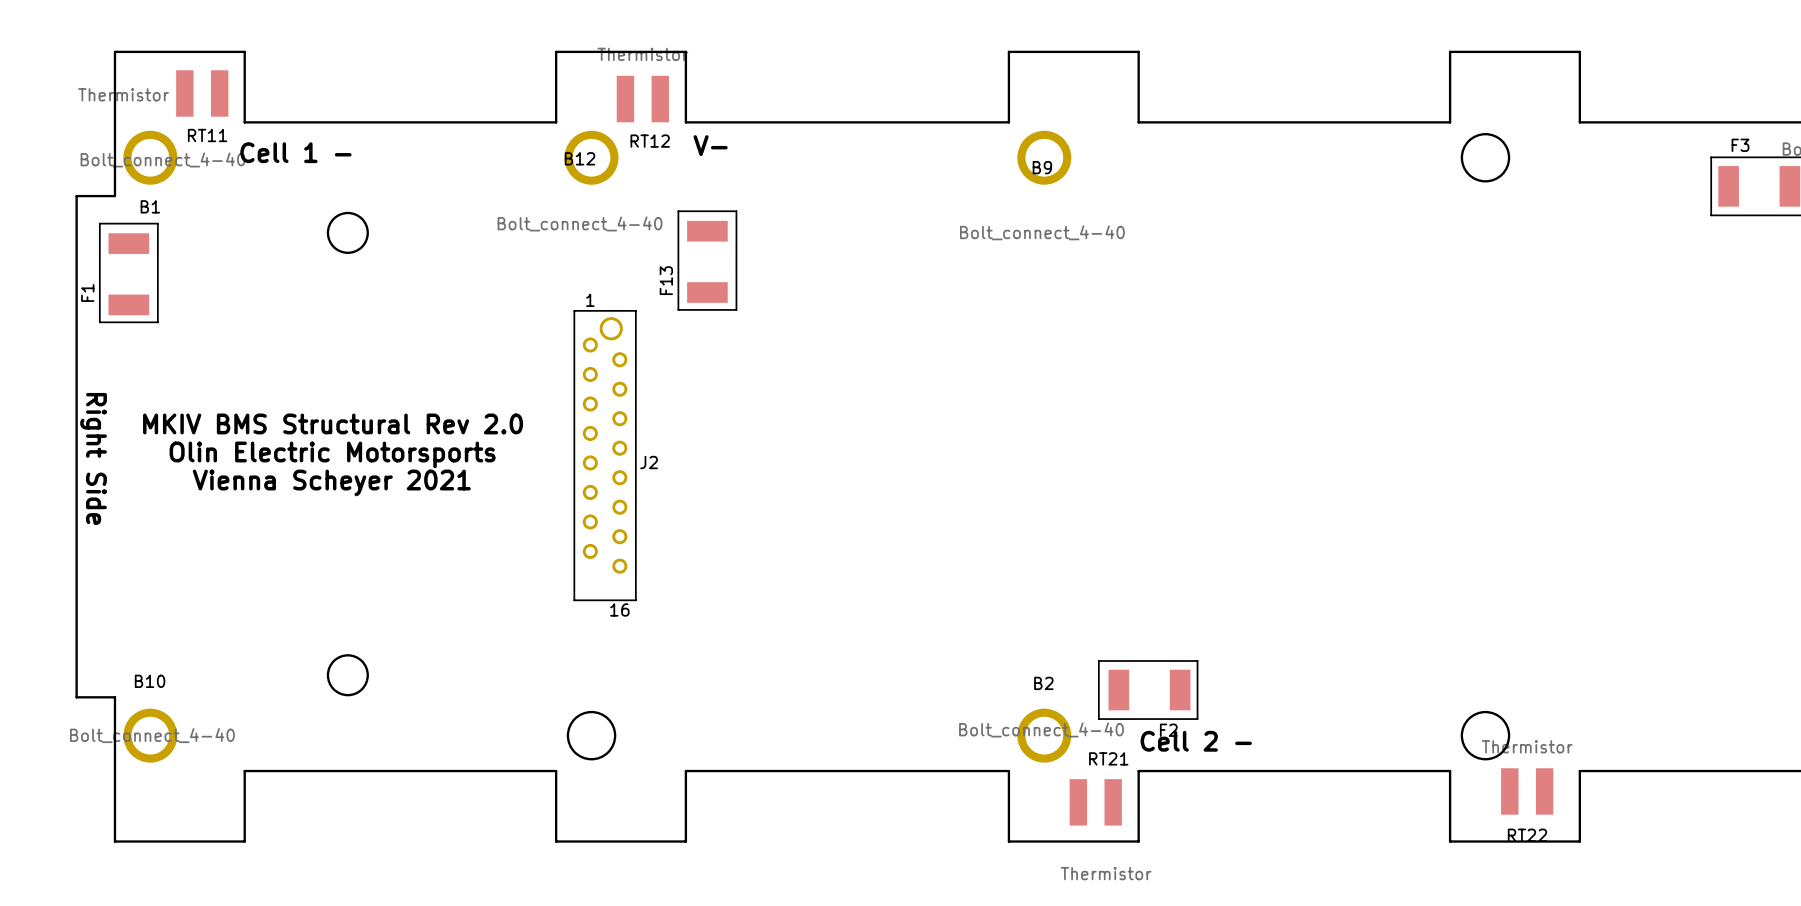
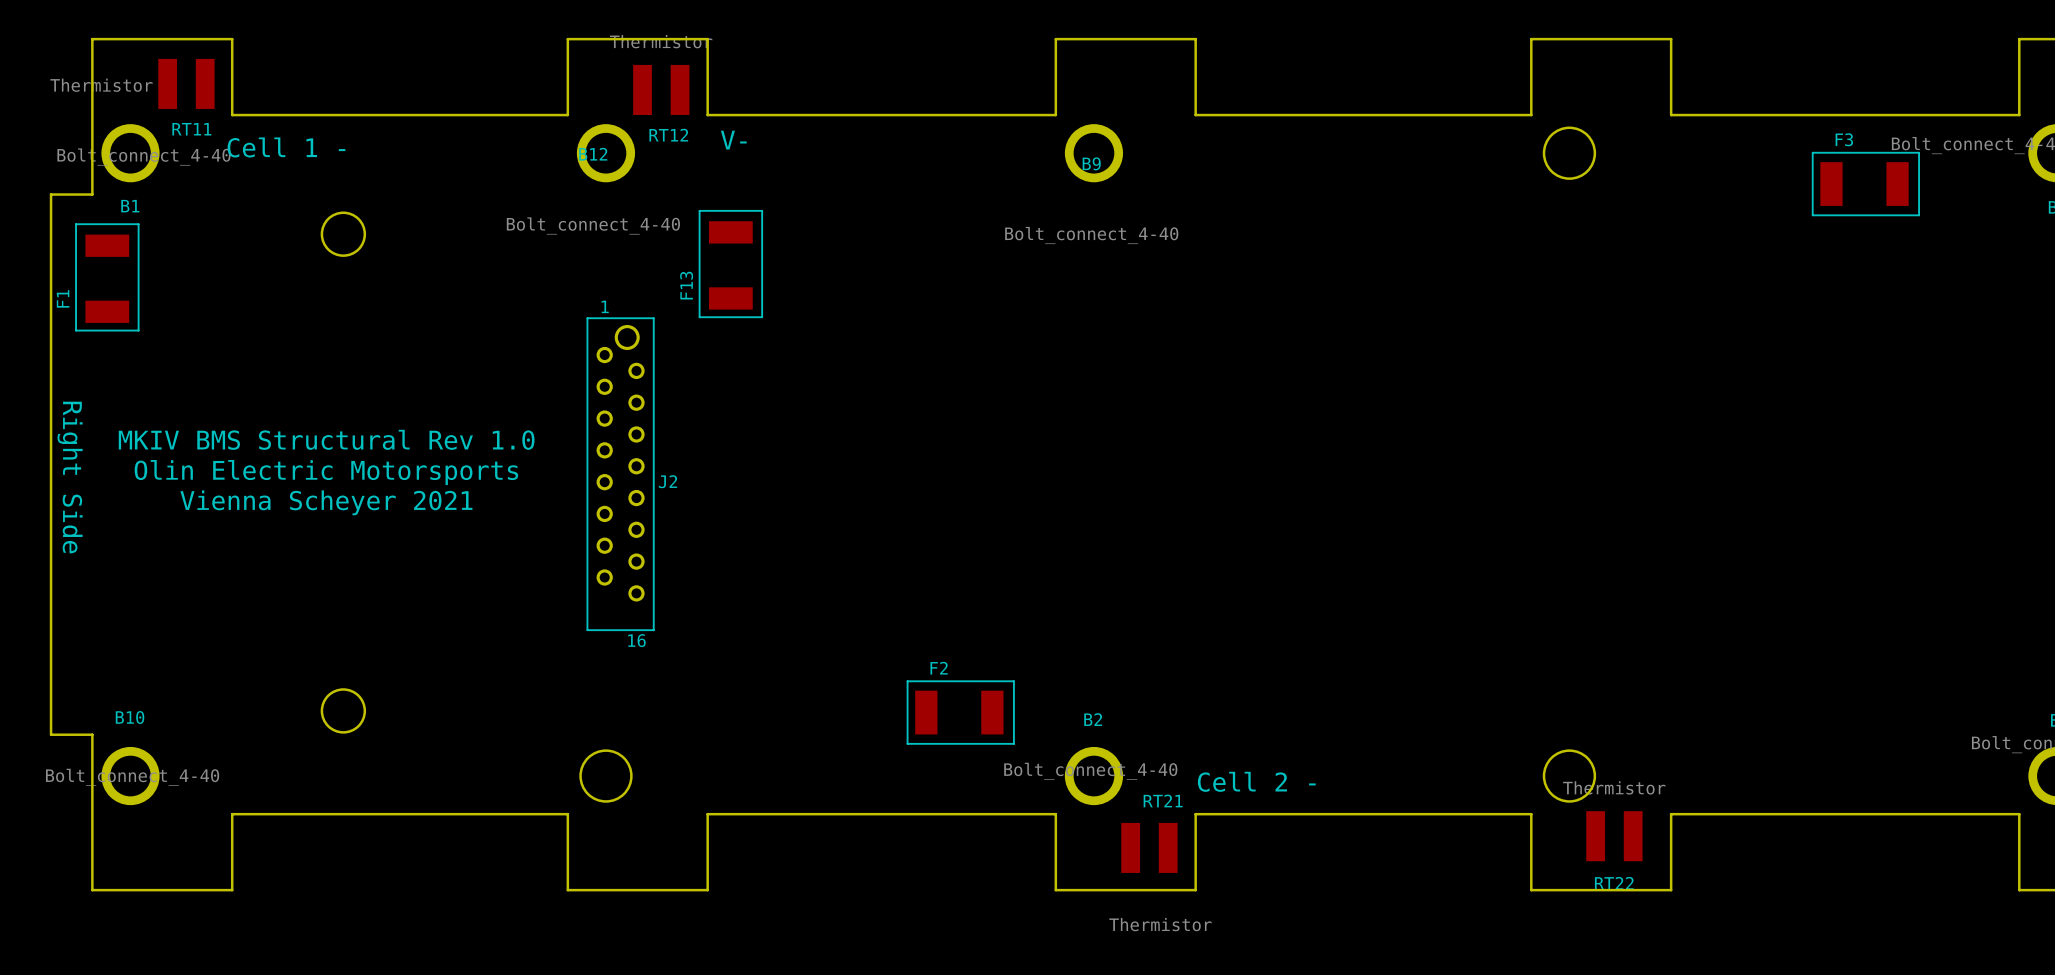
text: MKIV BMS Structural Rev 2.0 (333, 423) -> MKIV BMS Structural Rev 1.0 (326, 439)
F2 rotation: 0° (1148, 690) -> 180° (960, 712)
F2 position: (1148, 690) -> (960, 712)

